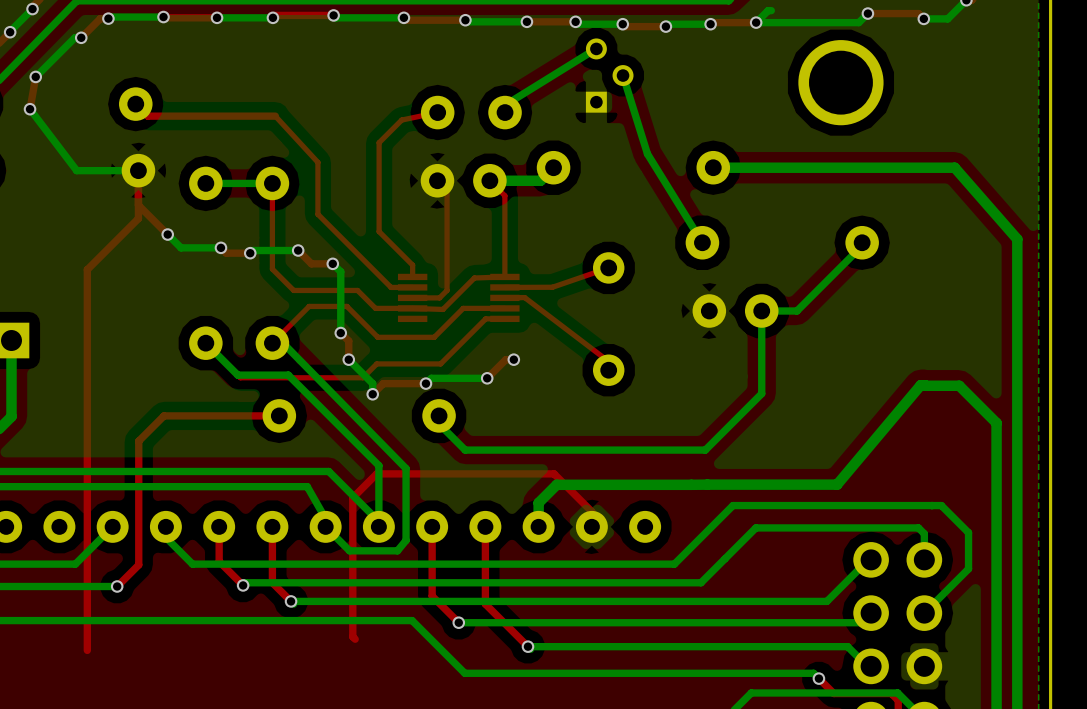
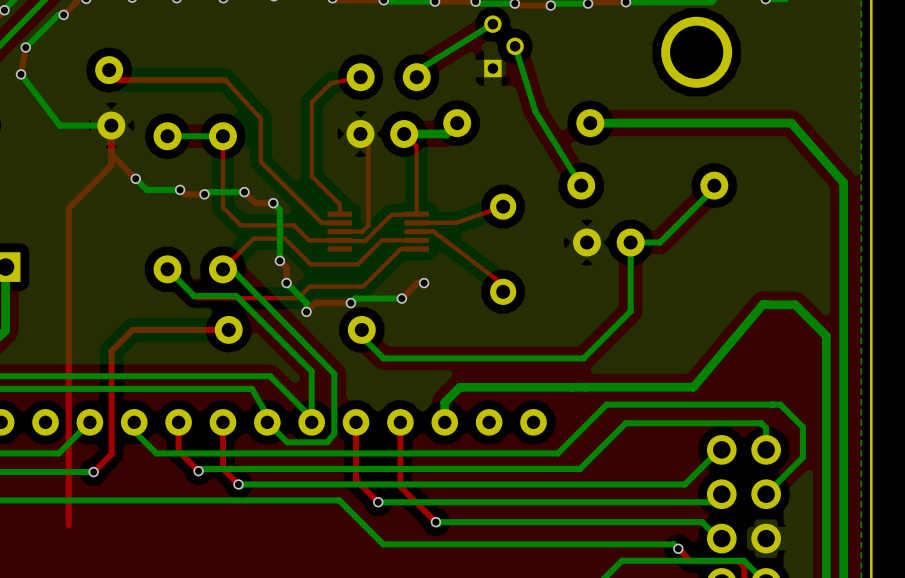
top track: (591, 526) (591, 511) (554, 473) (376, 473) (352, 497) (352, 636) (355, 639) -> none

